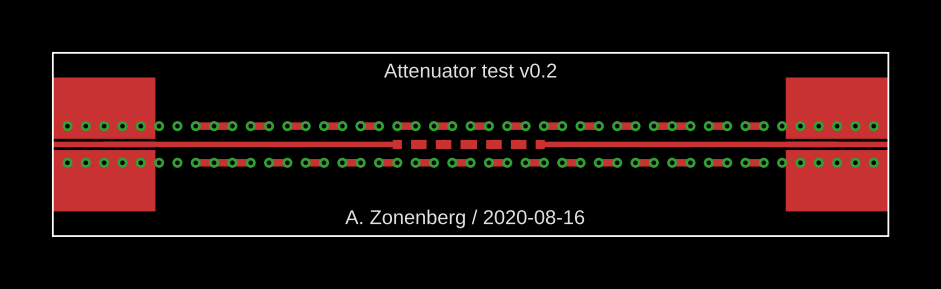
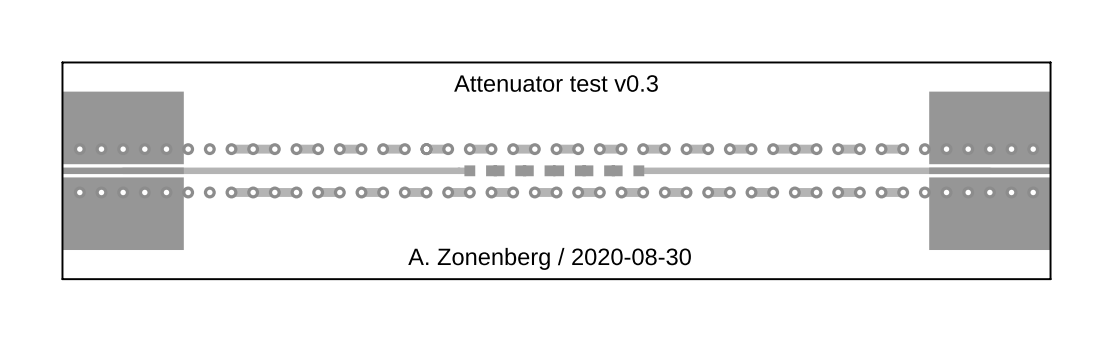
text: Attenuator test v0.2 (470, 70) -> Attenuator test v0.3 (556, 83)
text: A. Zonenberg / 2020-08-16 (464, 218) -> A. Zonenberg / 2020-08-30 (549, 258)

